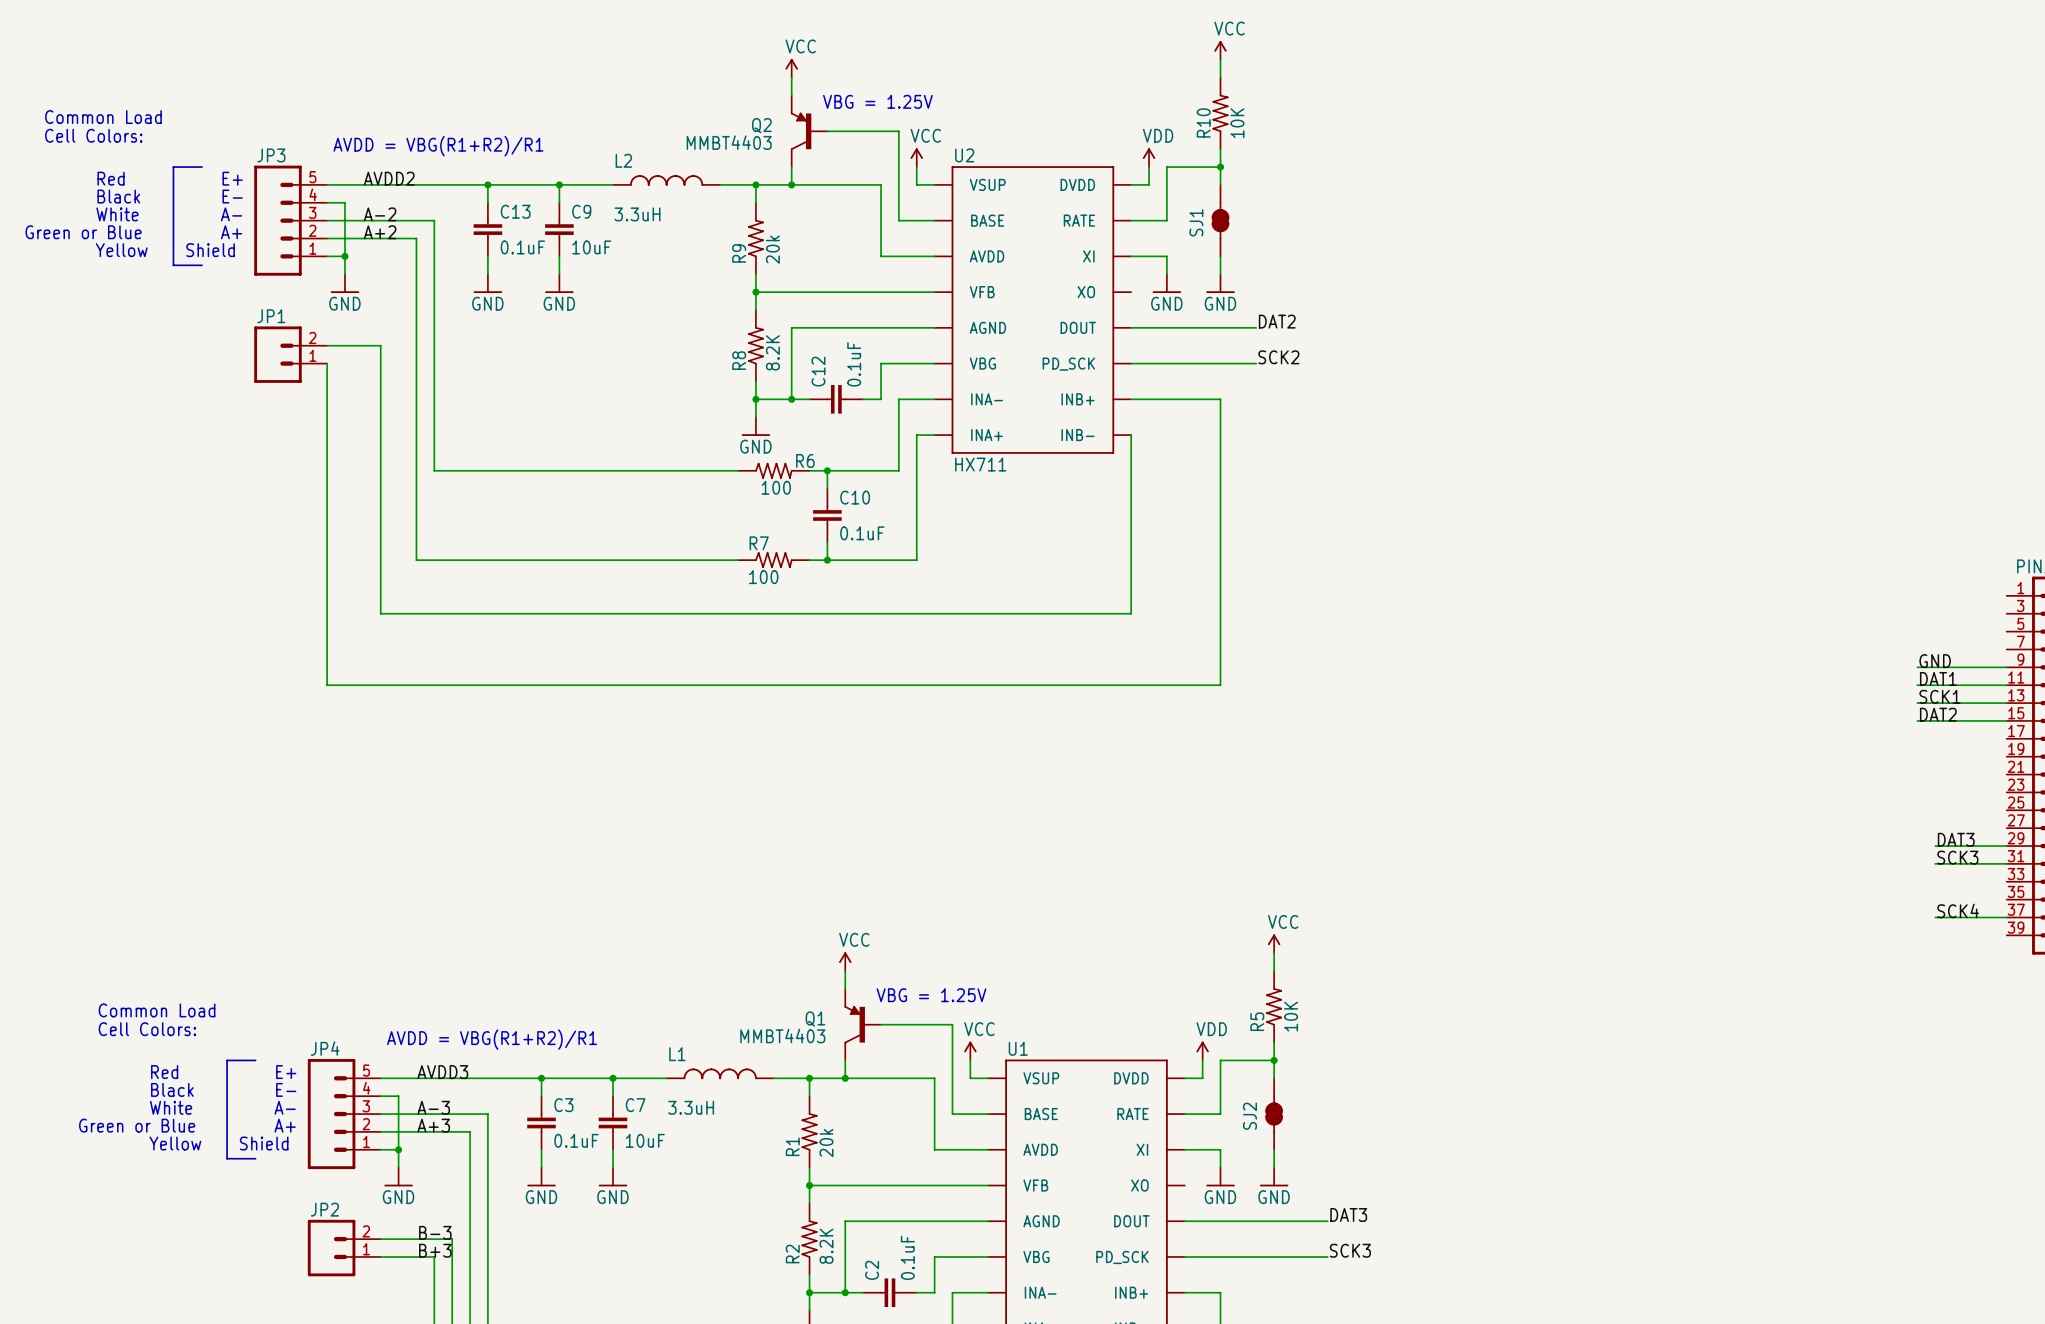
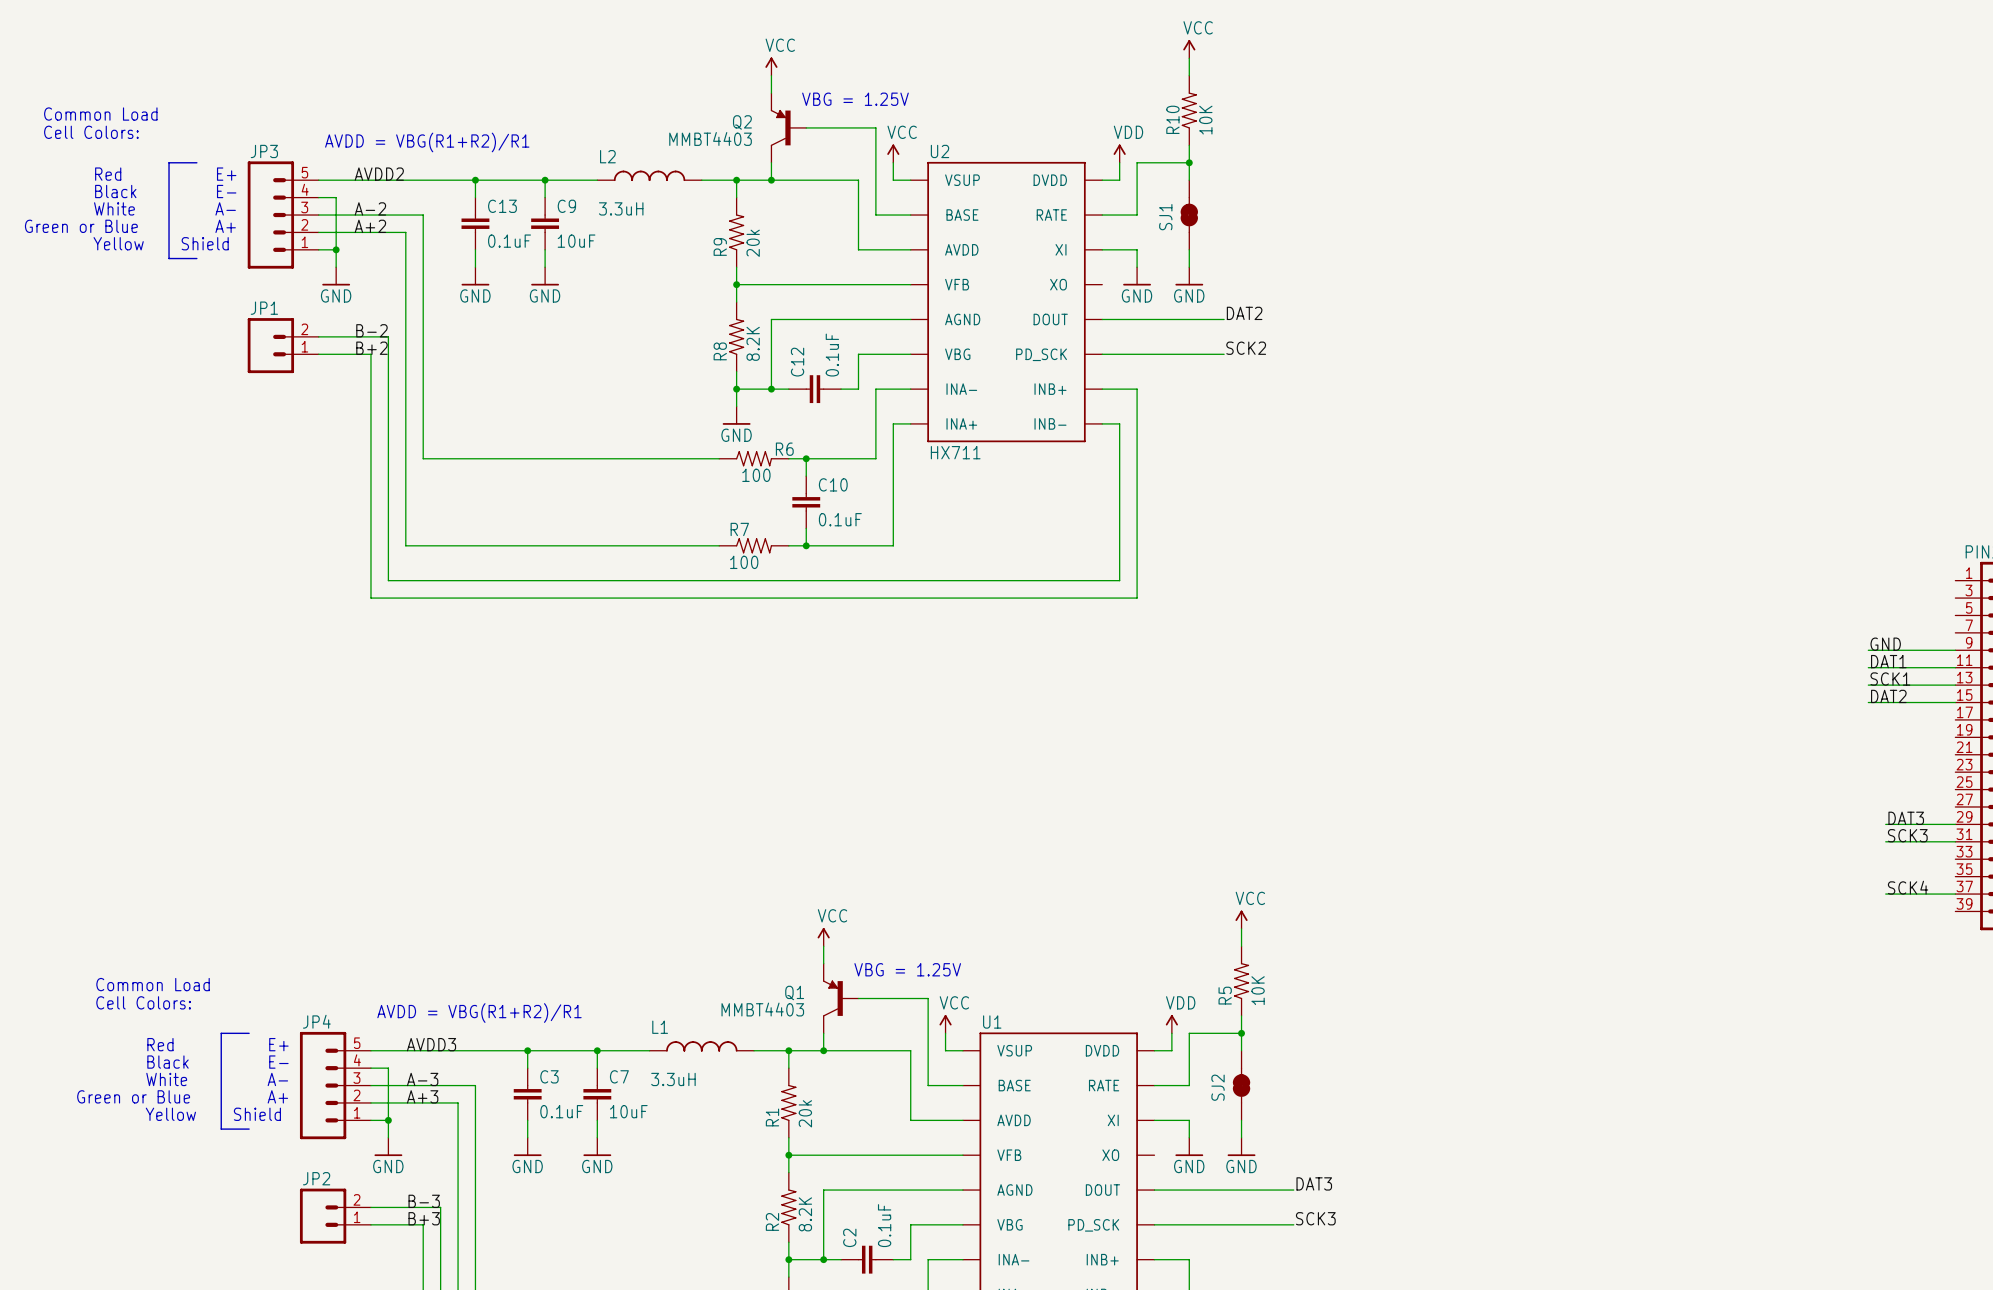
label: none -> B-2 (371, 330)
wire: (380, 345) (380, 363) -> (318, 354) (370, 354)
wire: none -> (370, 336) (388, 336) (388, 580) (1119, 580) (1119, 423) (1102, 423)
label: none -> B+2 (371, 348)
wire: (327, 363) (327, 685) (1220, 685) (1220, 399) (1166, 399) -> none
wire: (1131, 435) (1131, 613) -> (1137, 389) (1137, 598) (1102, 598)

